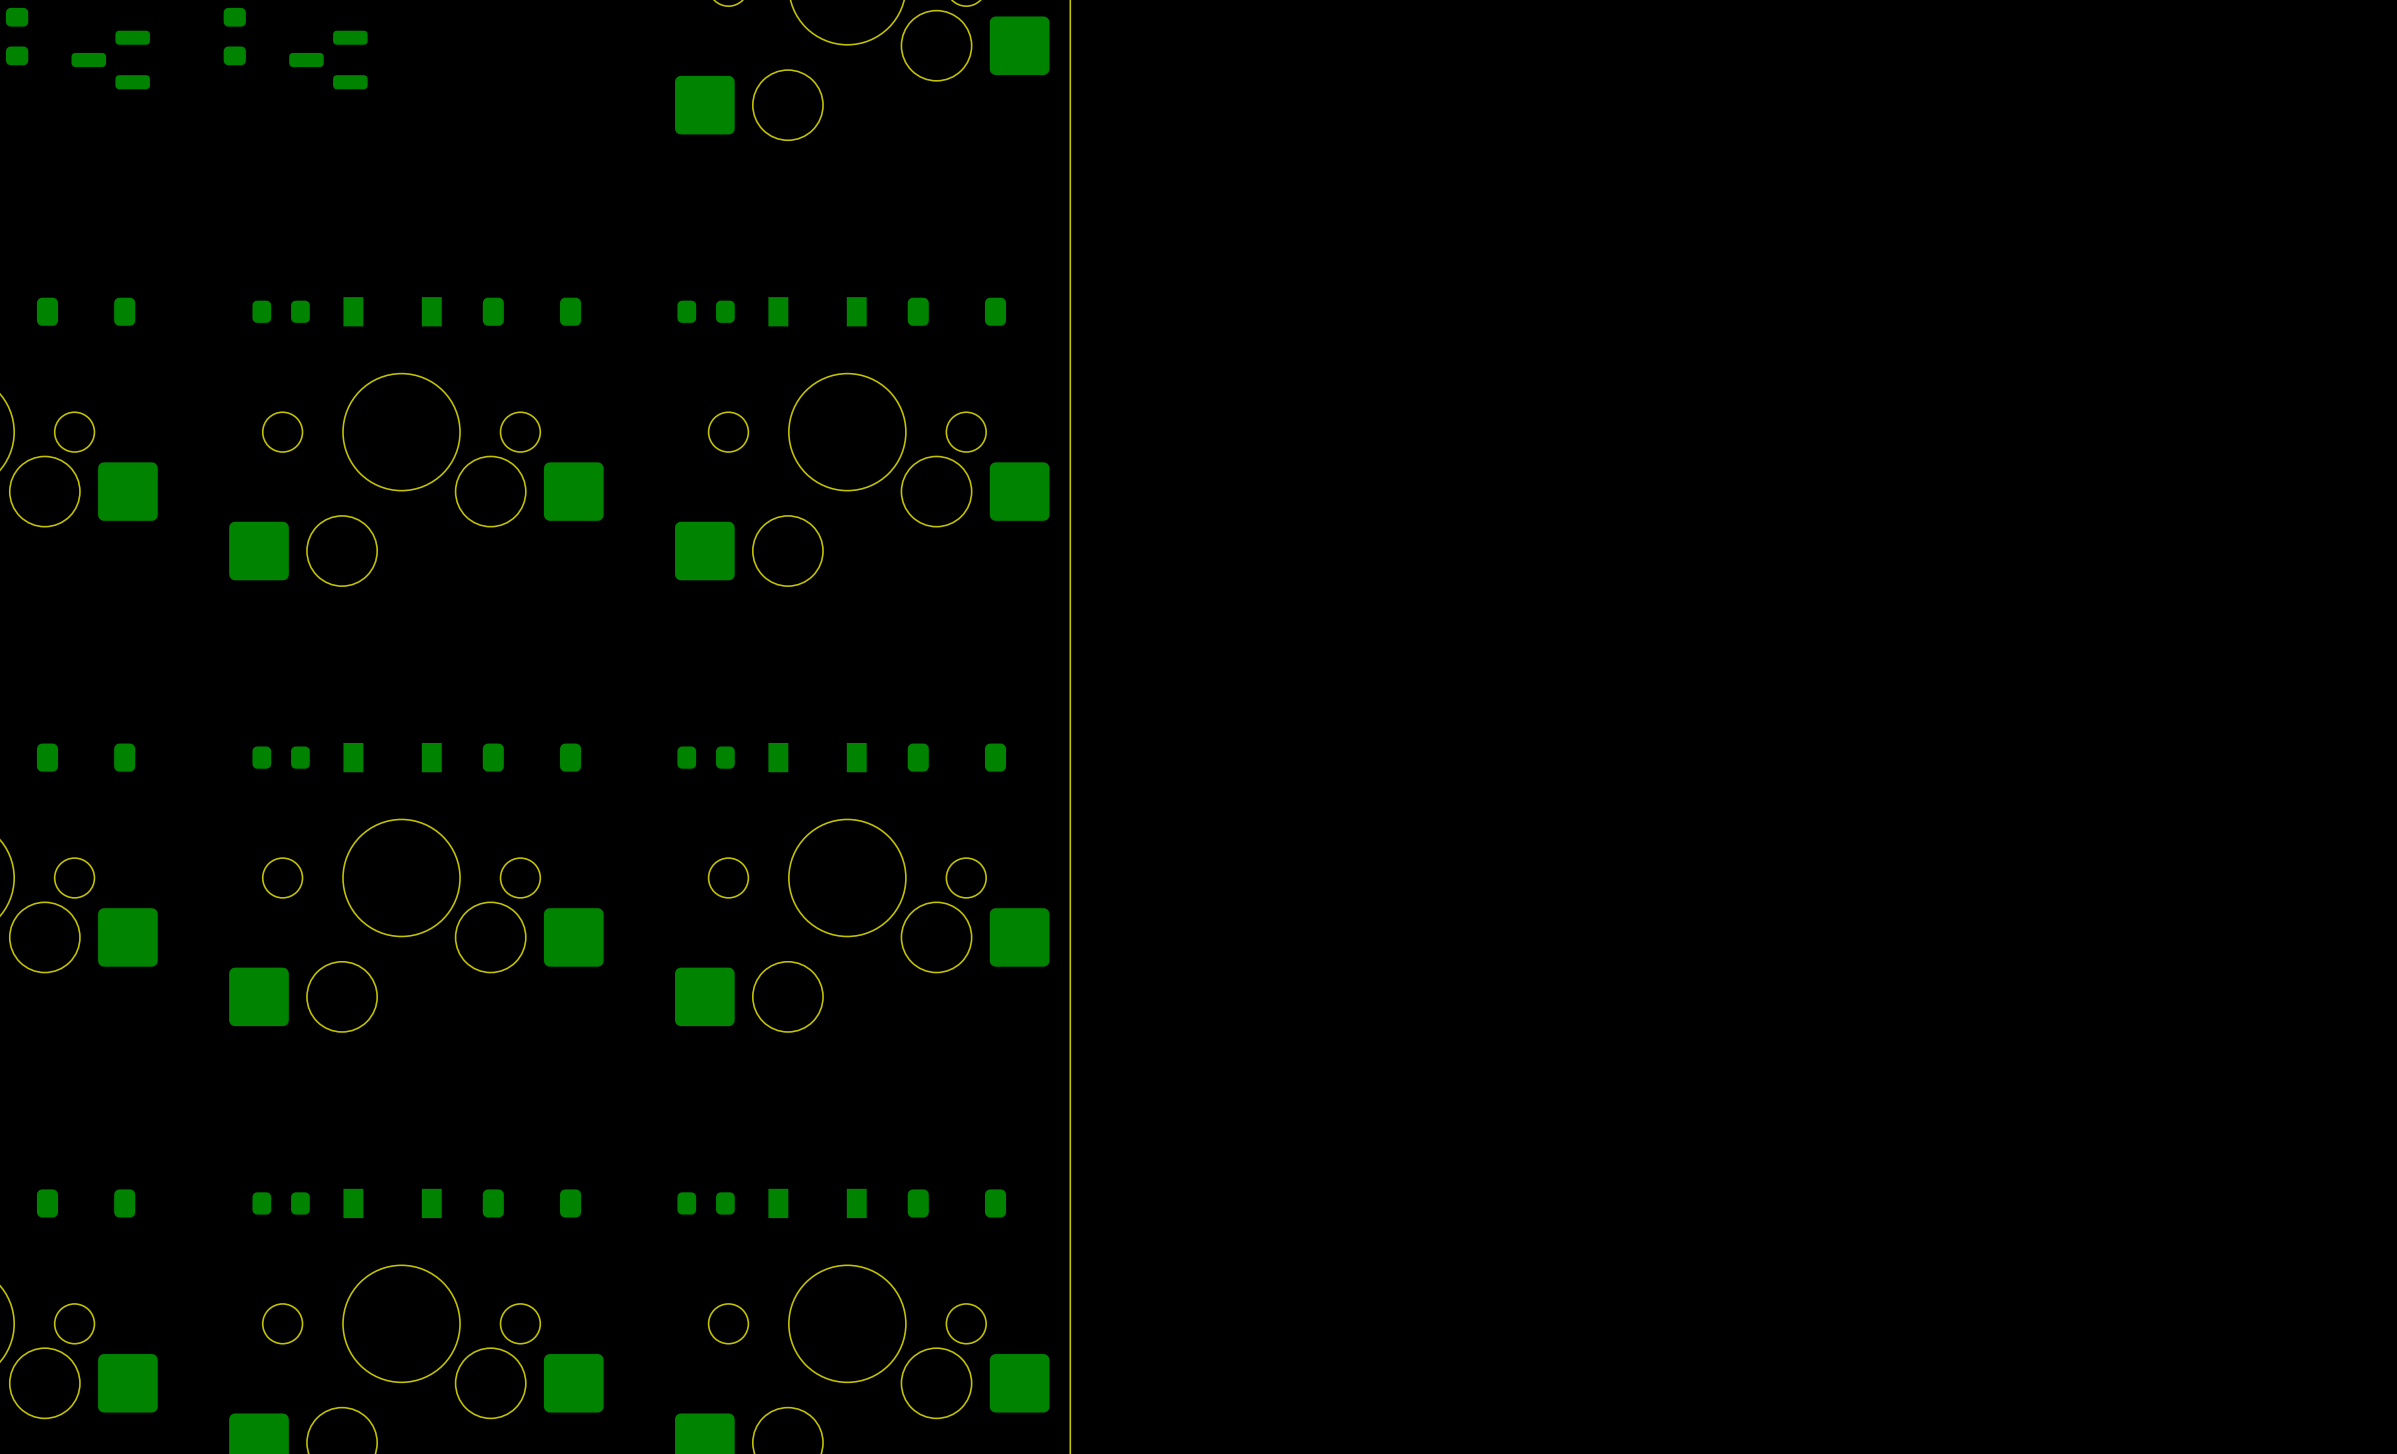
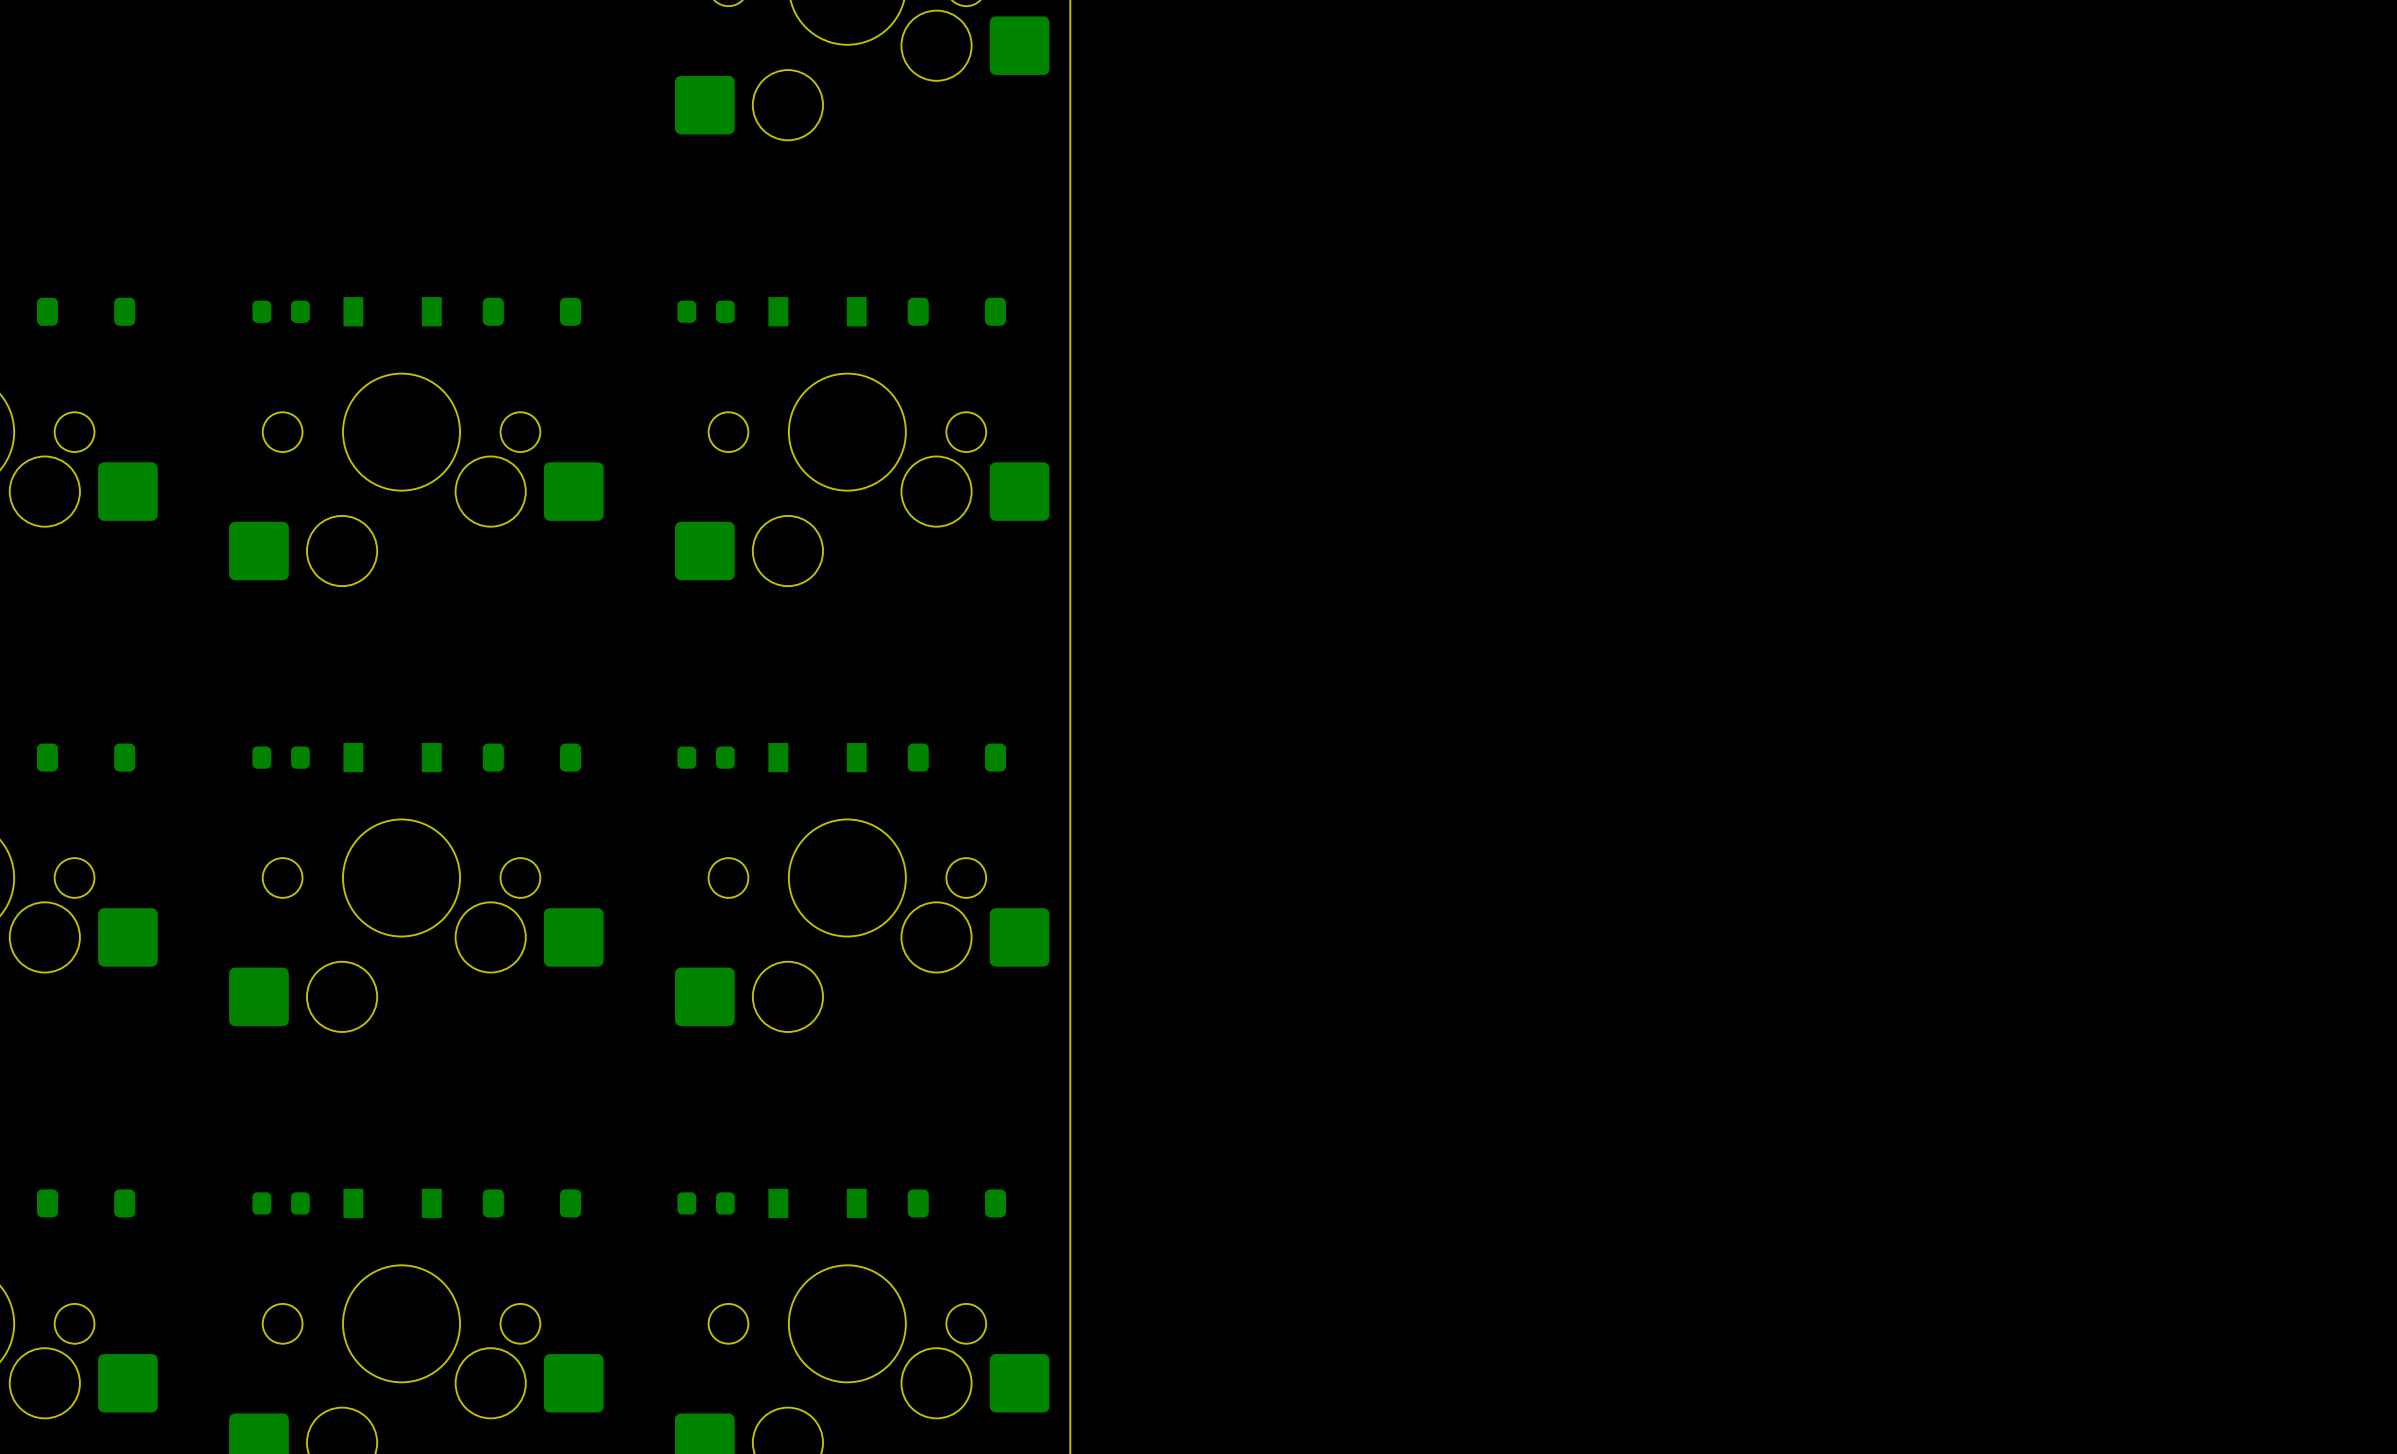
part: (17, 36) -> none
part: (234, 36) -> none
part: (110, 59) -> none
part: (328, 59) -> none

